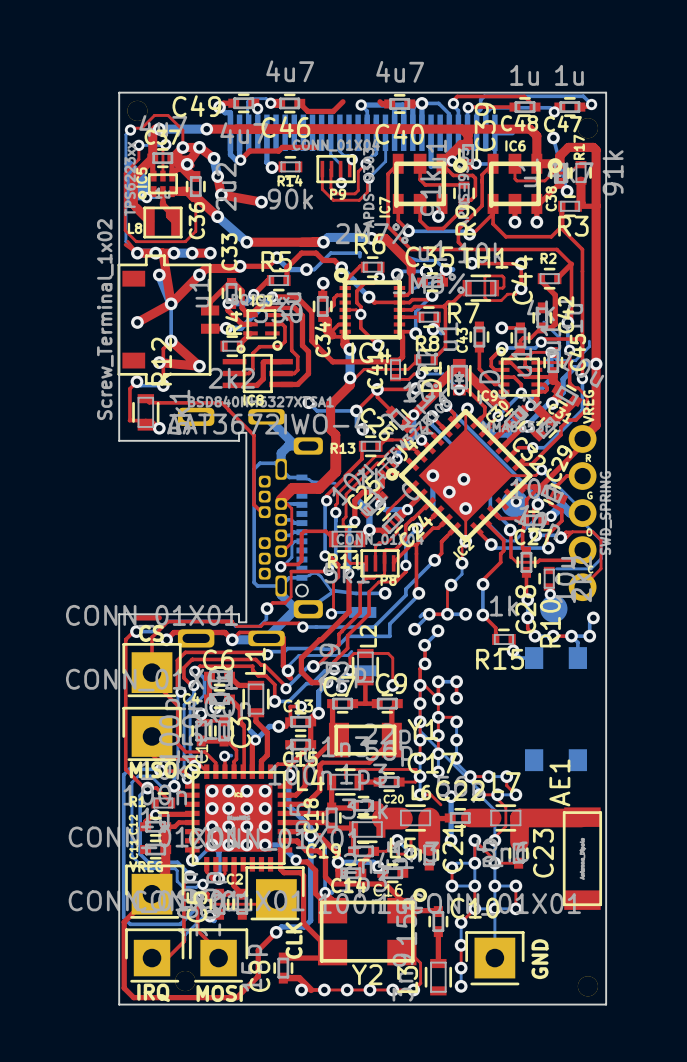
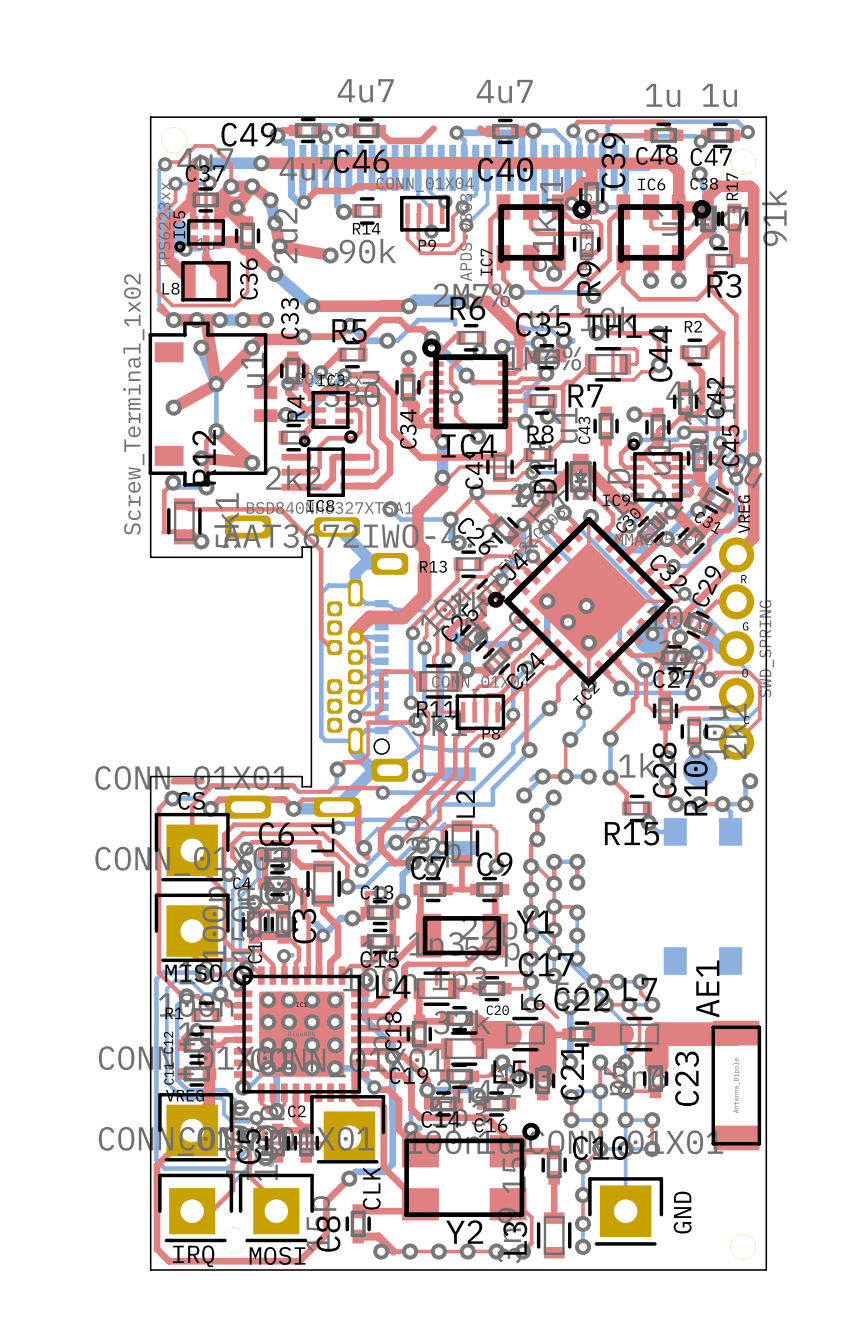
C38 name rotation: 0° (551, 198) -> 90° clockwise (704, 183)
C38 name position: C38 (551, 198) -> C38 (704, 183)

